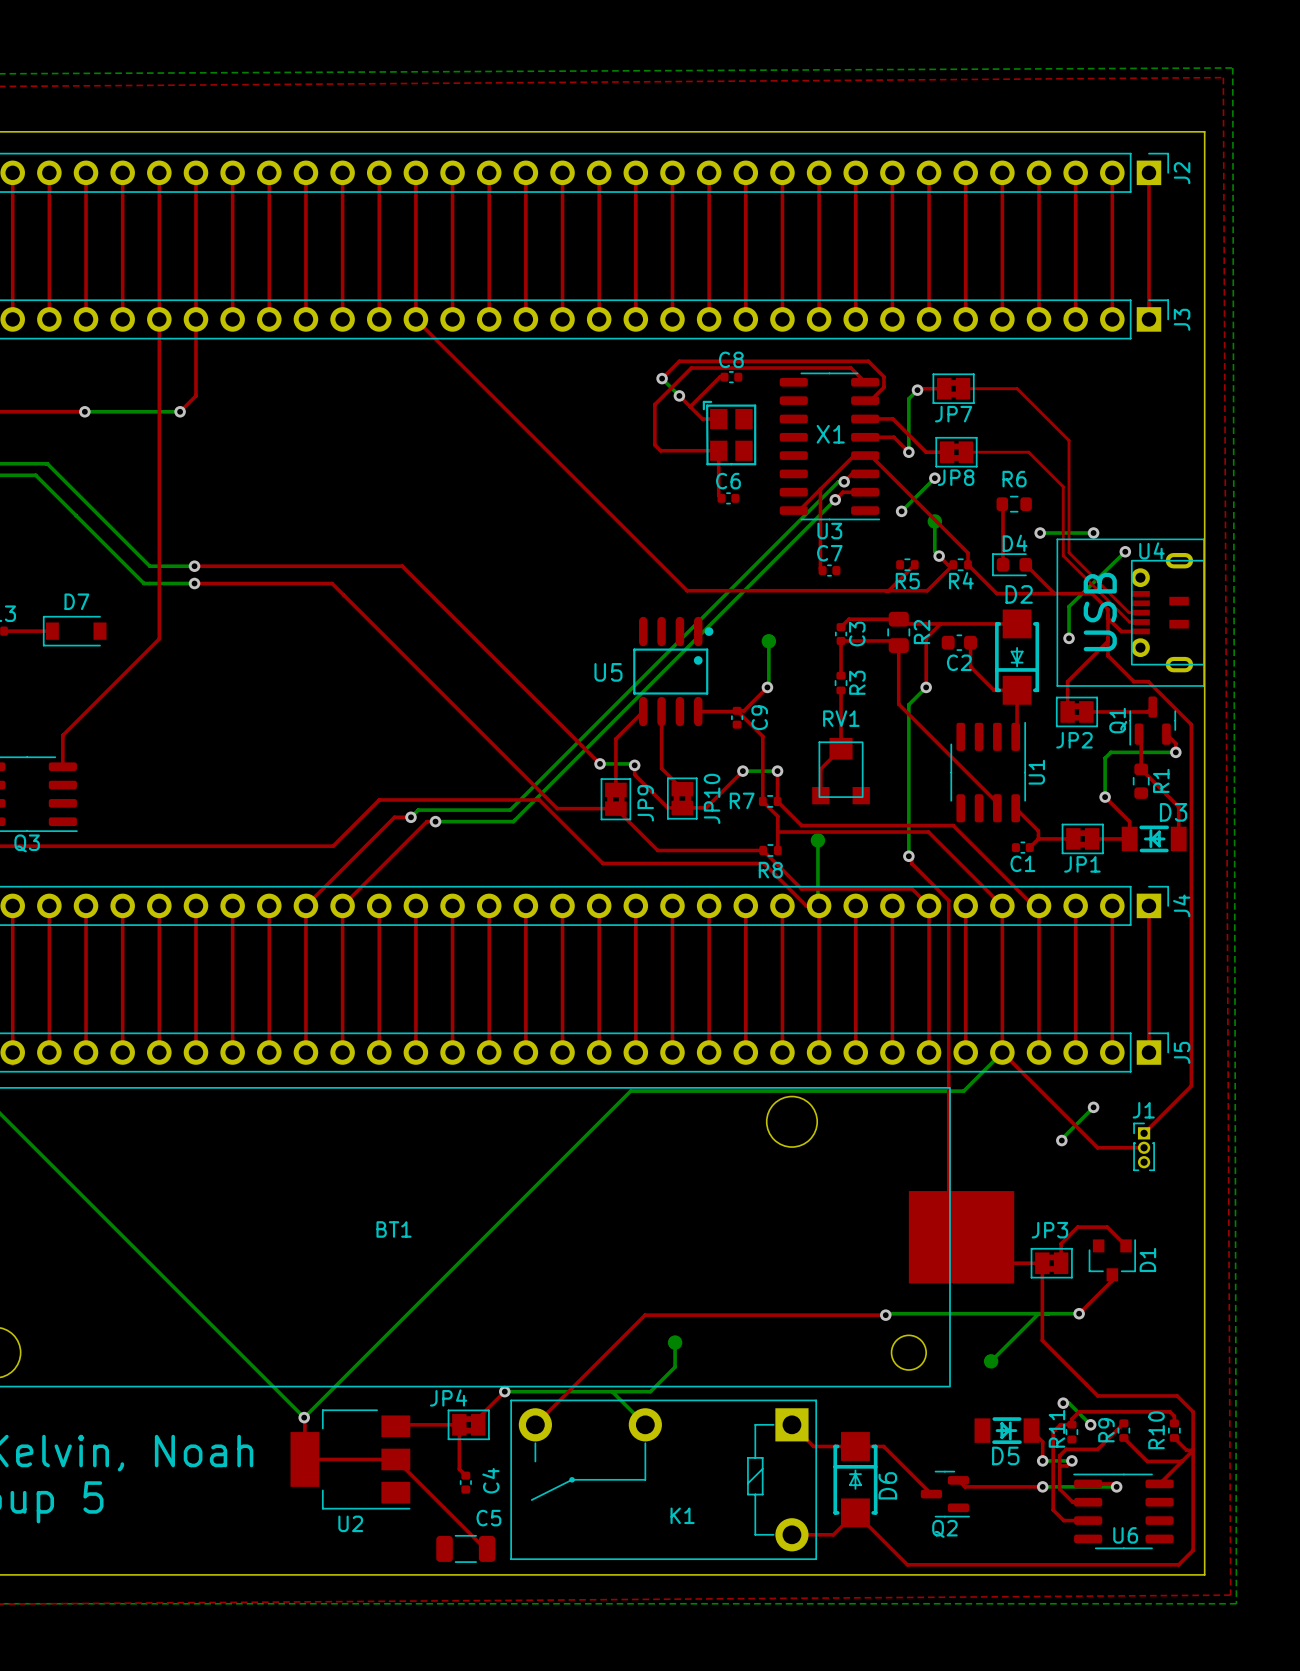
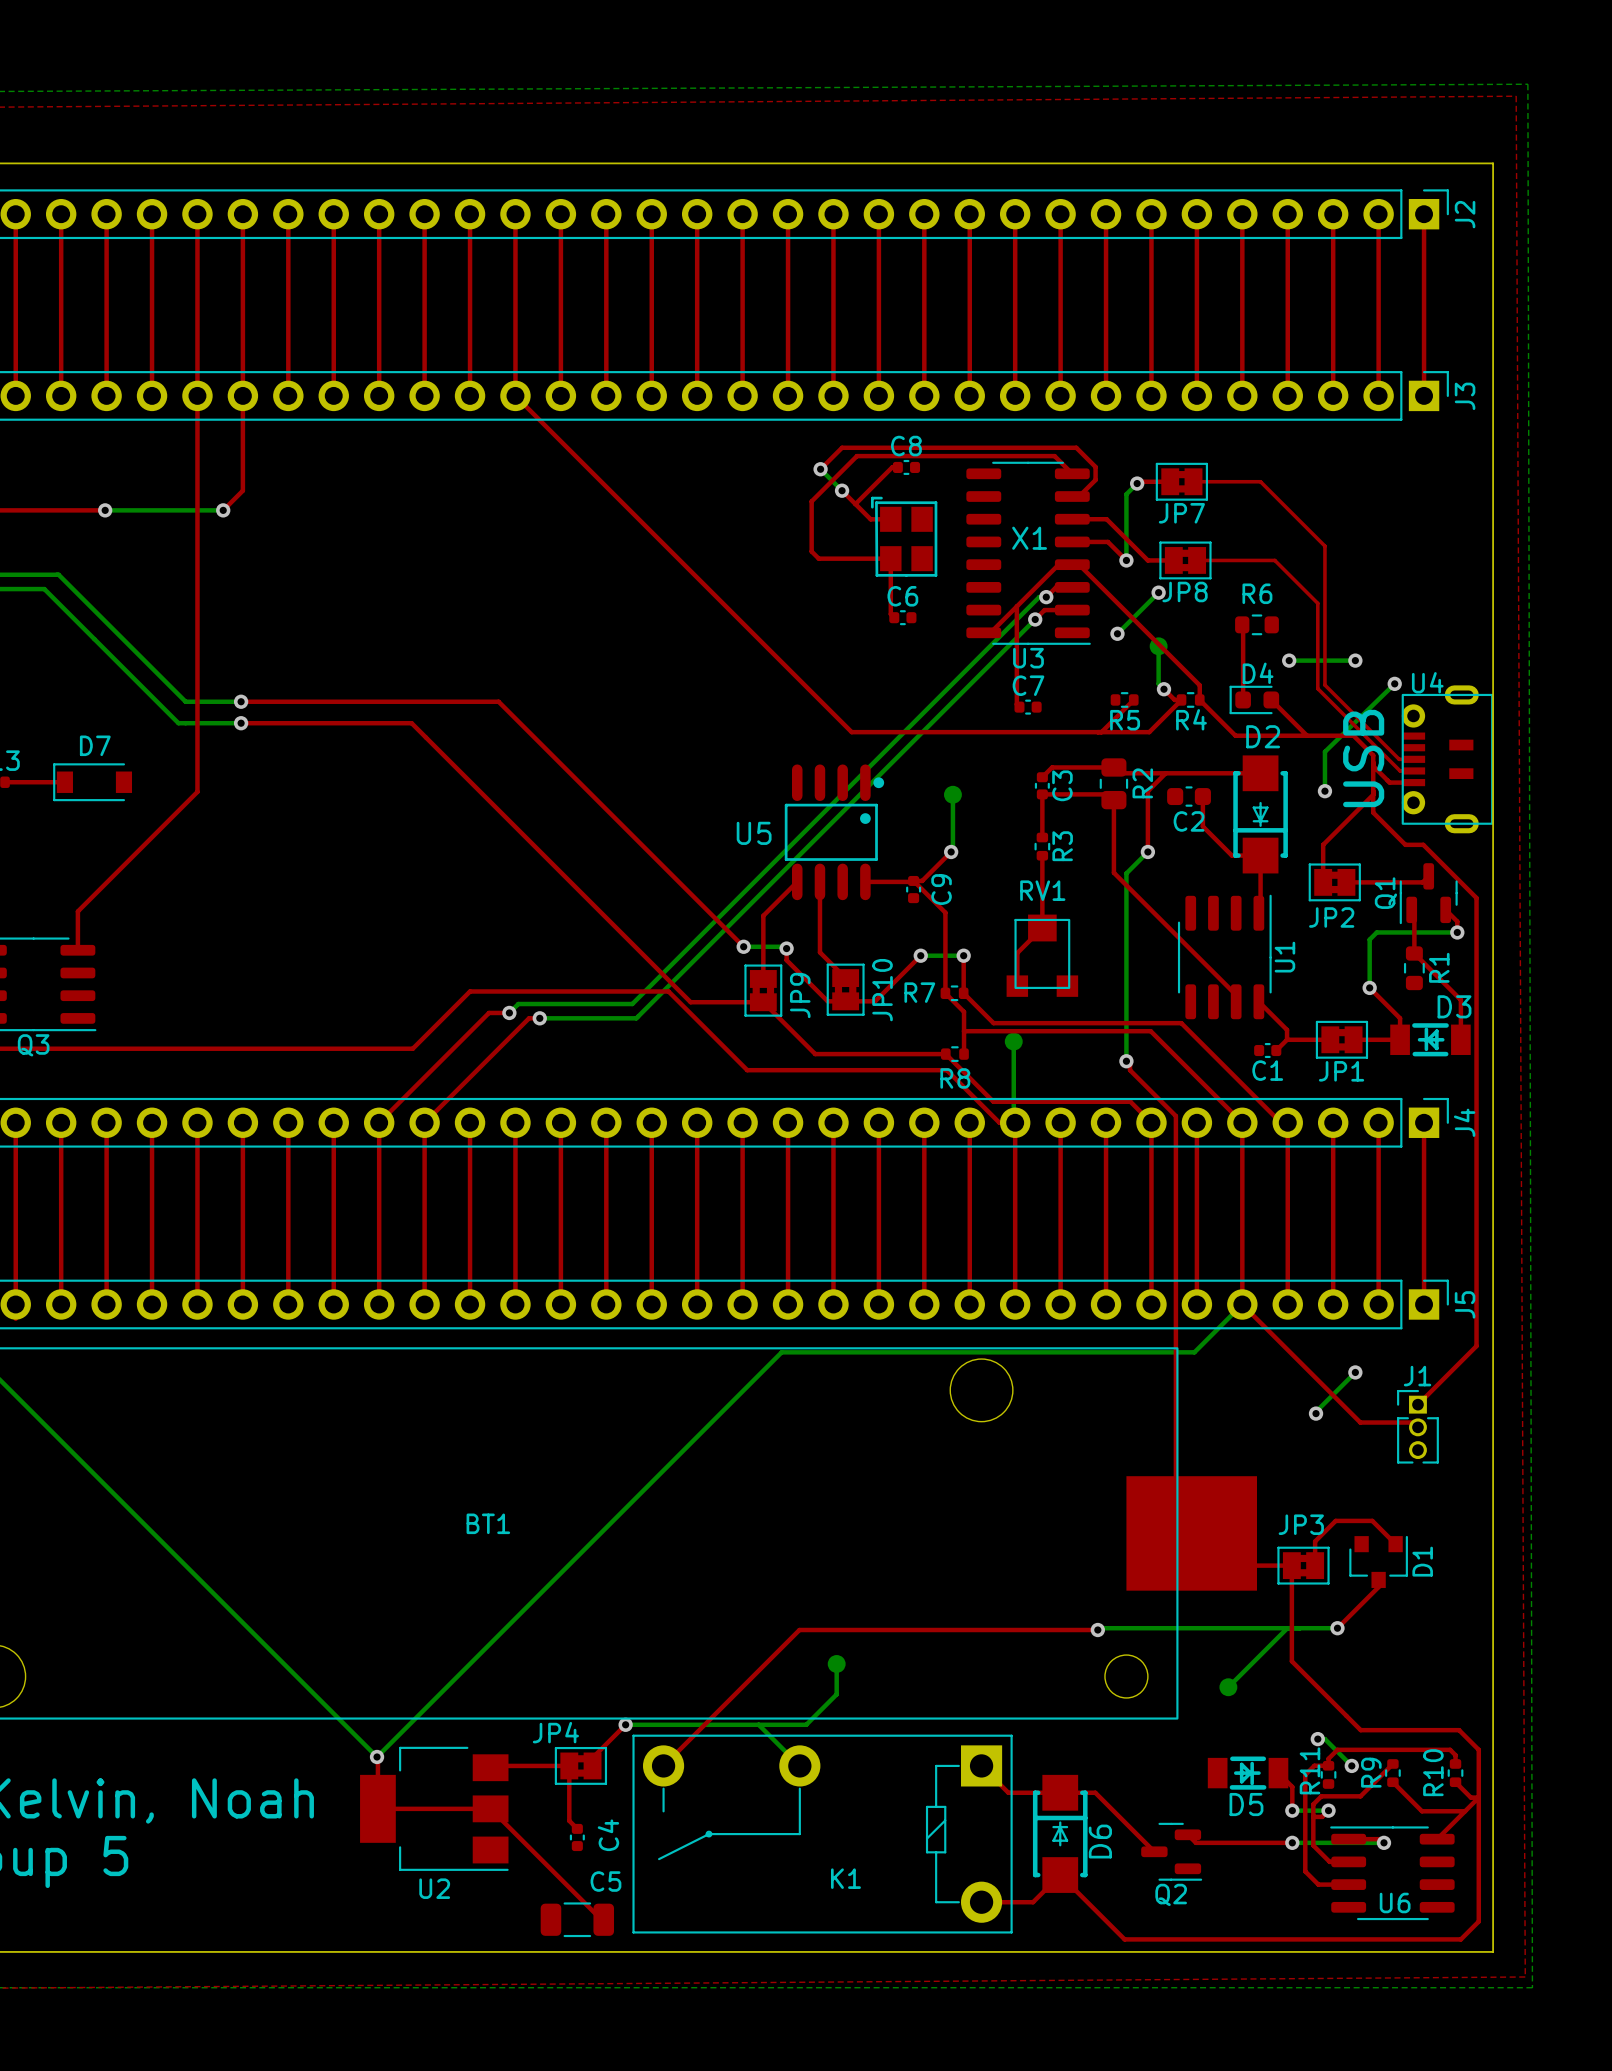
line: (1057, 539) (1203, 539) (1203, 685) (1057, 685) (1057, 539) -> none
J1 footprint: [1133, 1122, 1155, 1172] -> [1397, 1389, 1439, 1464]

